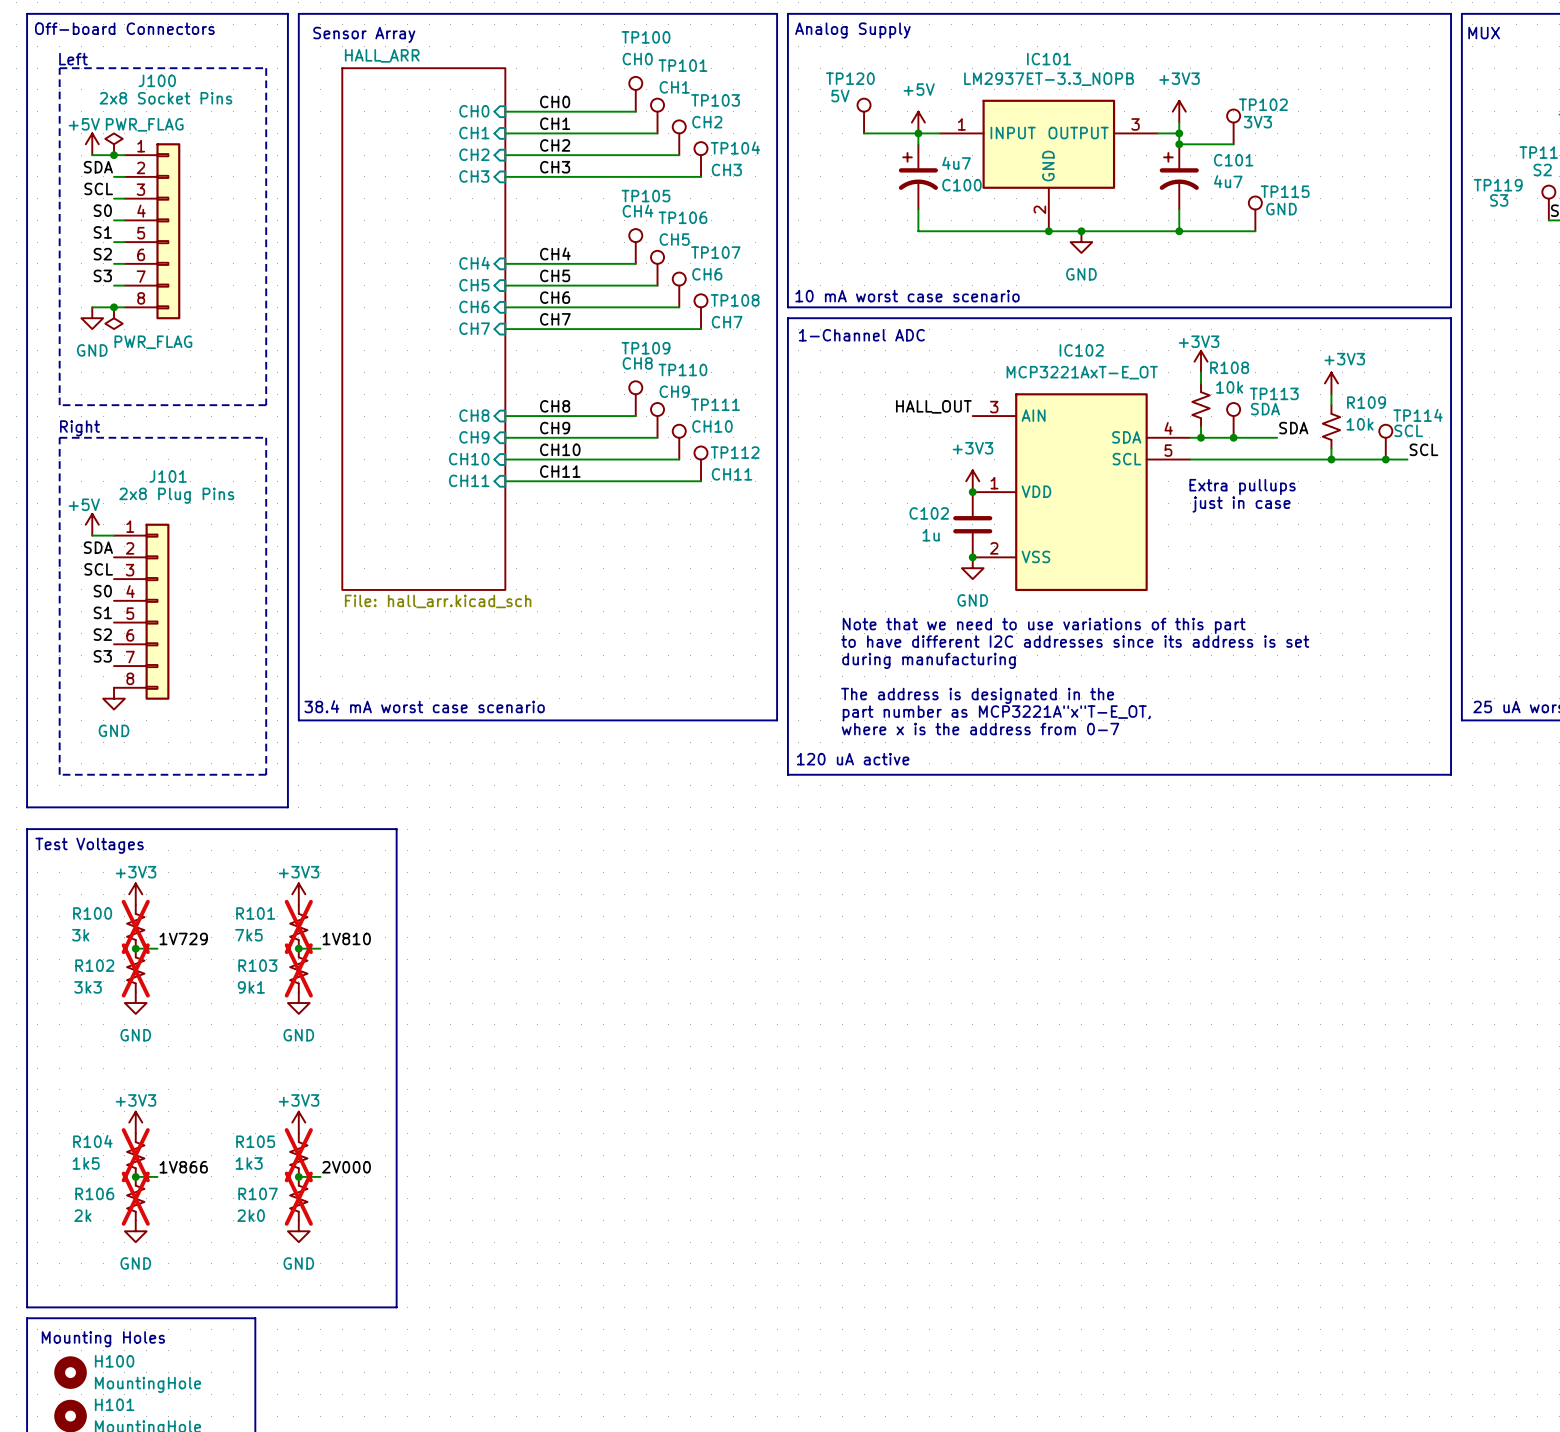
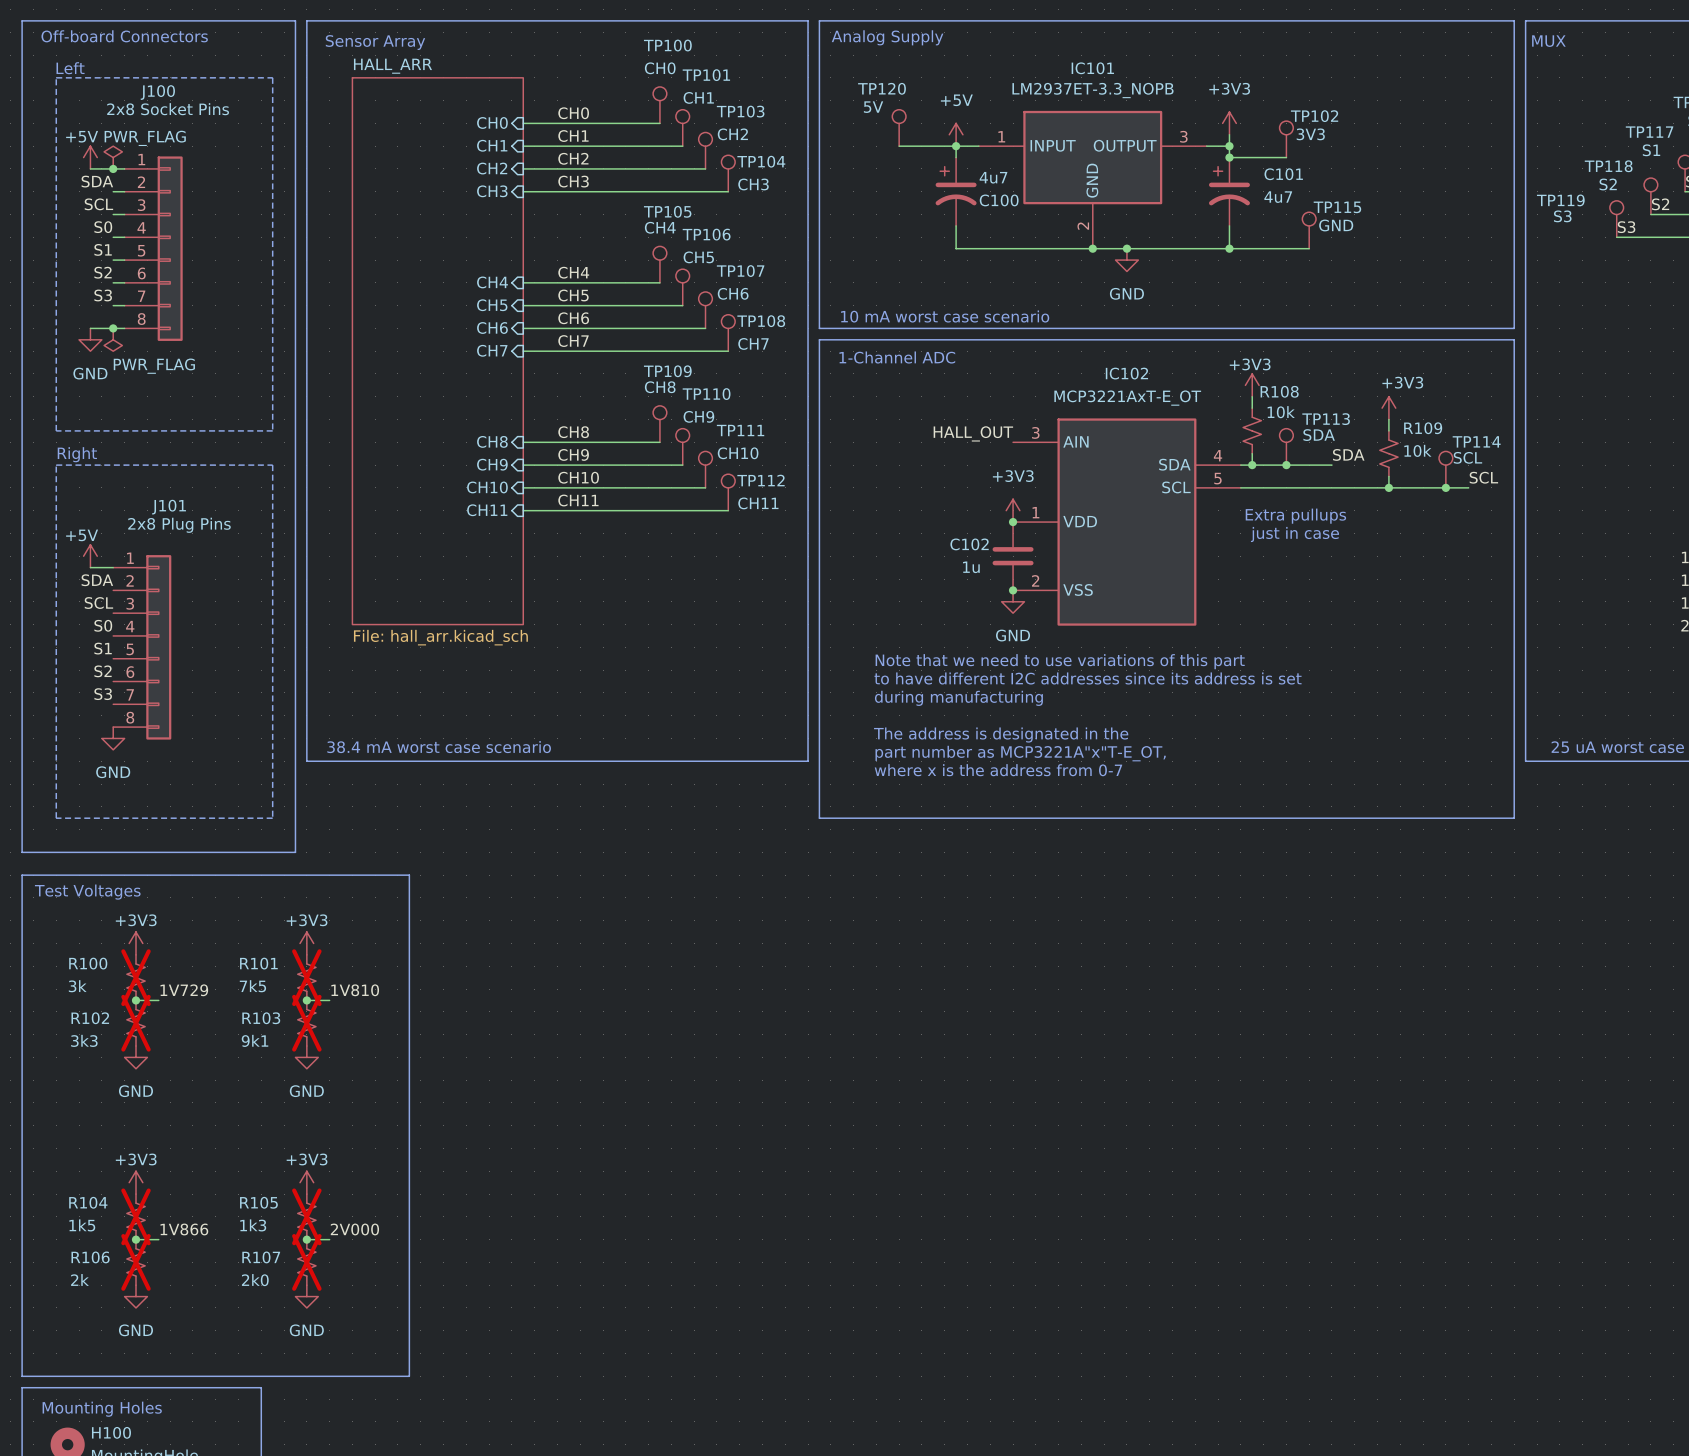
text: 120 uA active (853, 759) -> none

